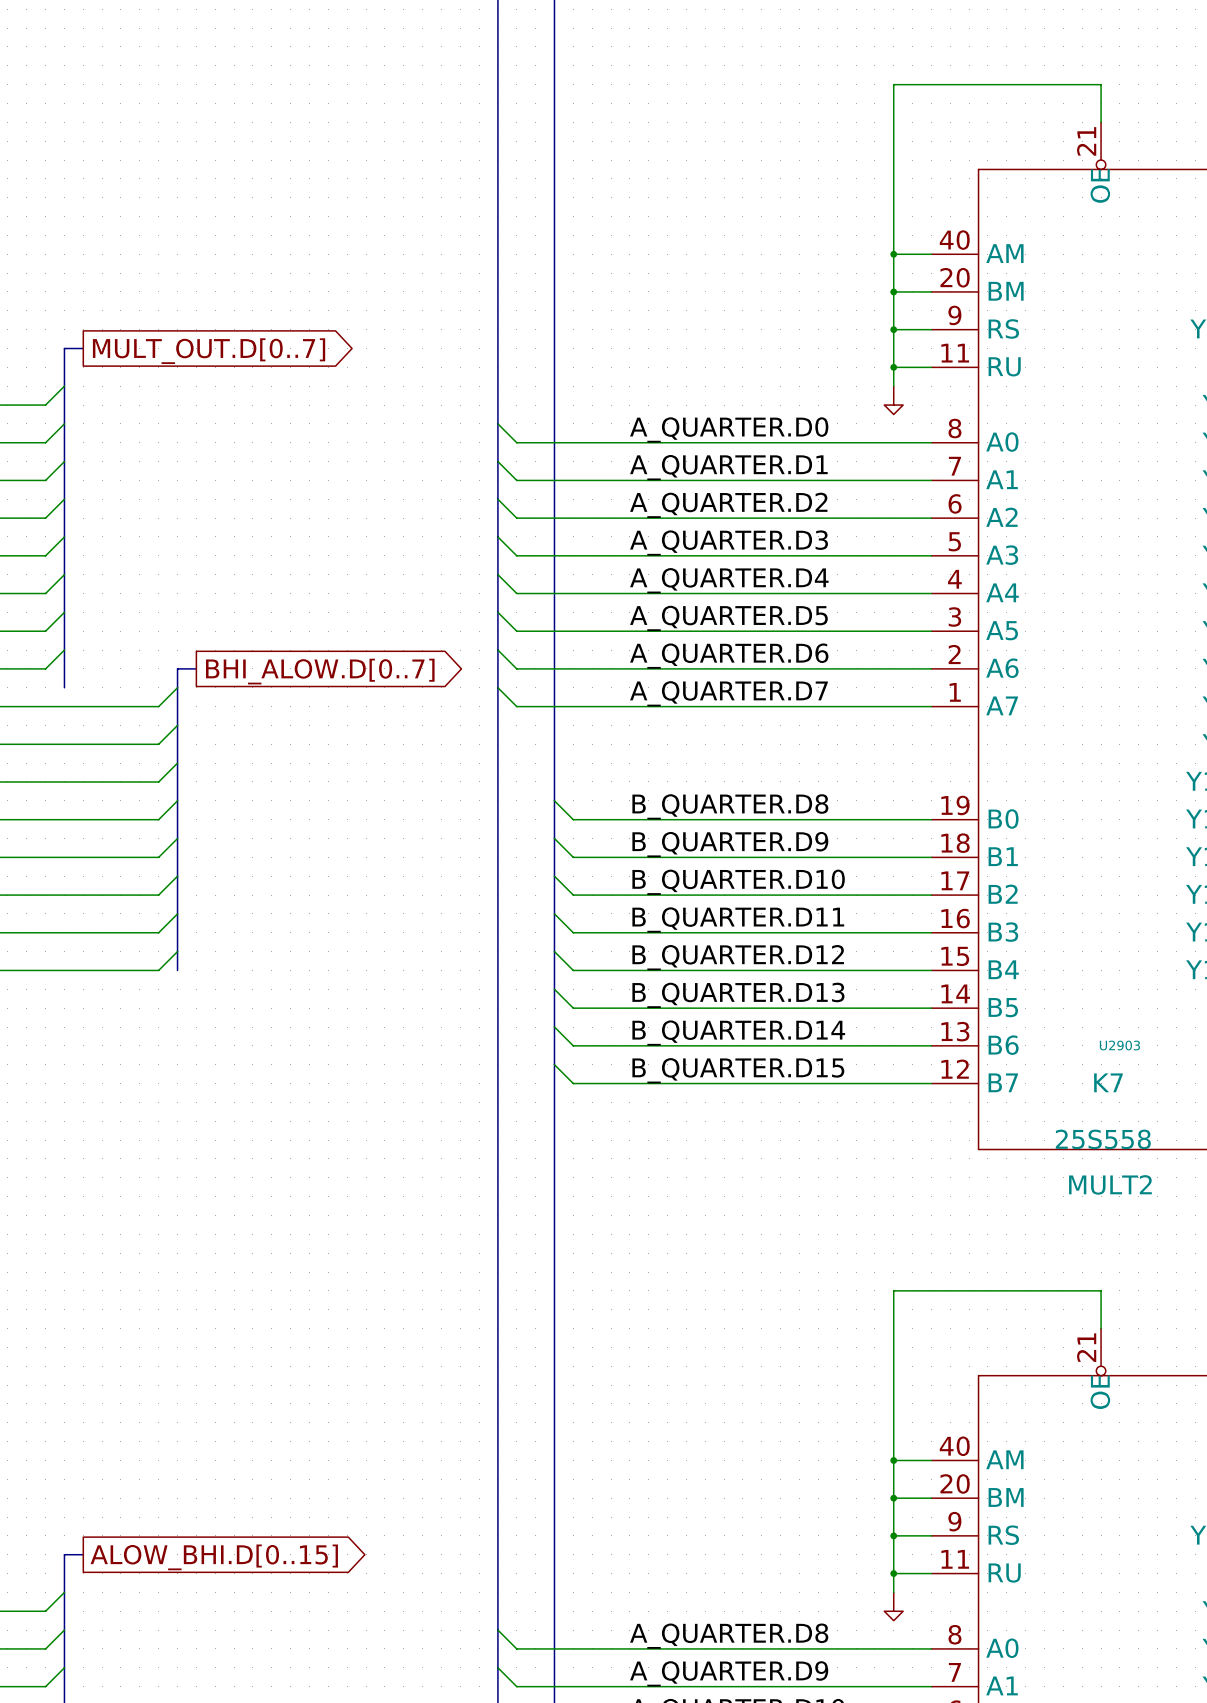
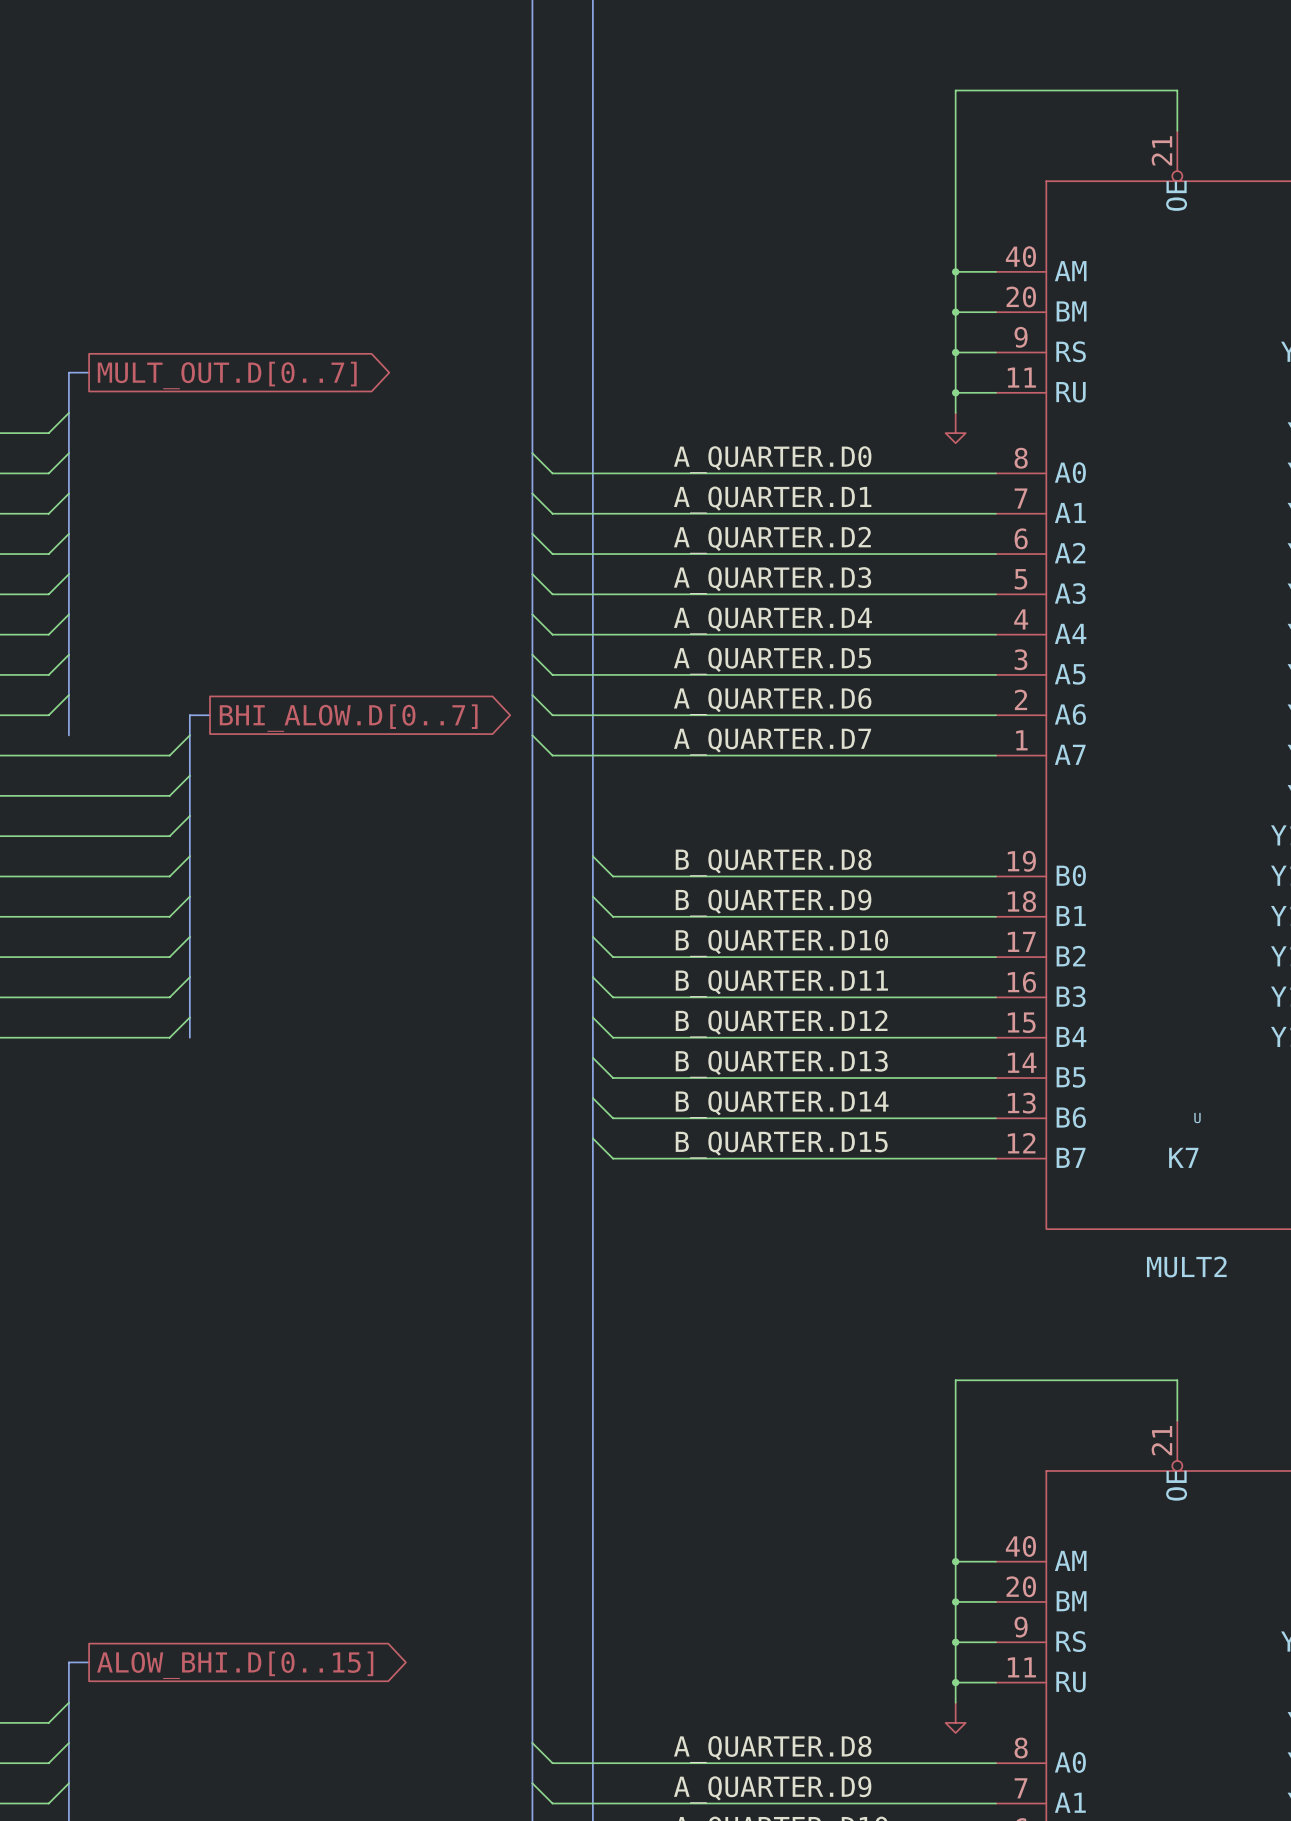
U2903 name: U2903 (1119, 1045) -> U (1197, 1118)
U2903 value: 25S558 (1103, 1139) -> none

